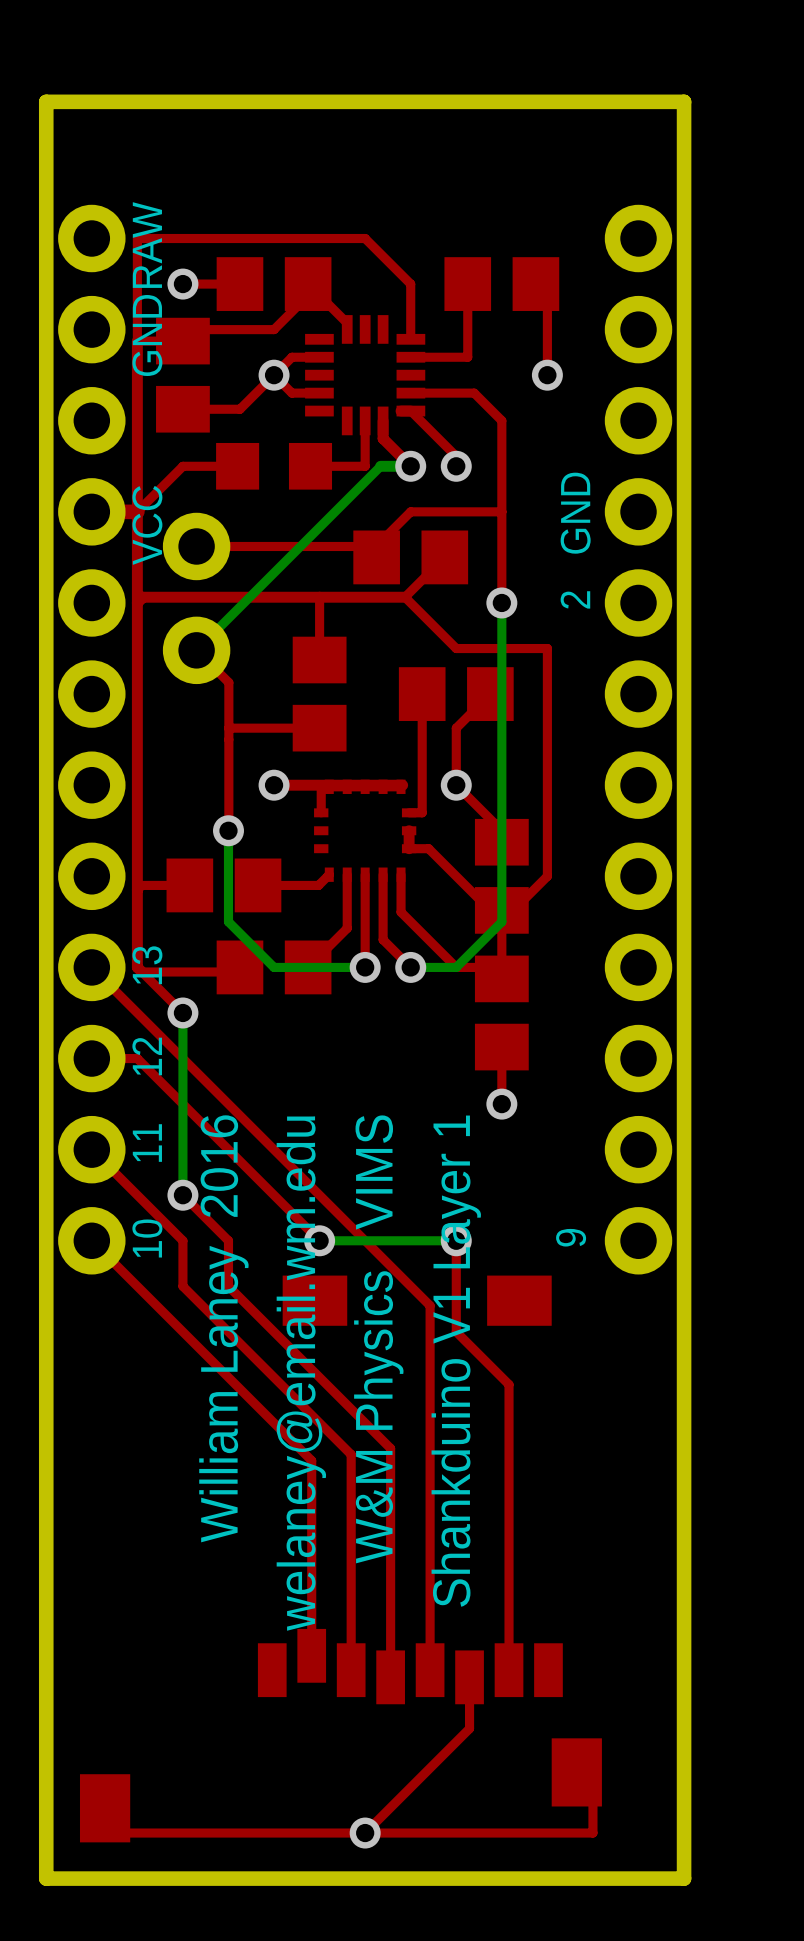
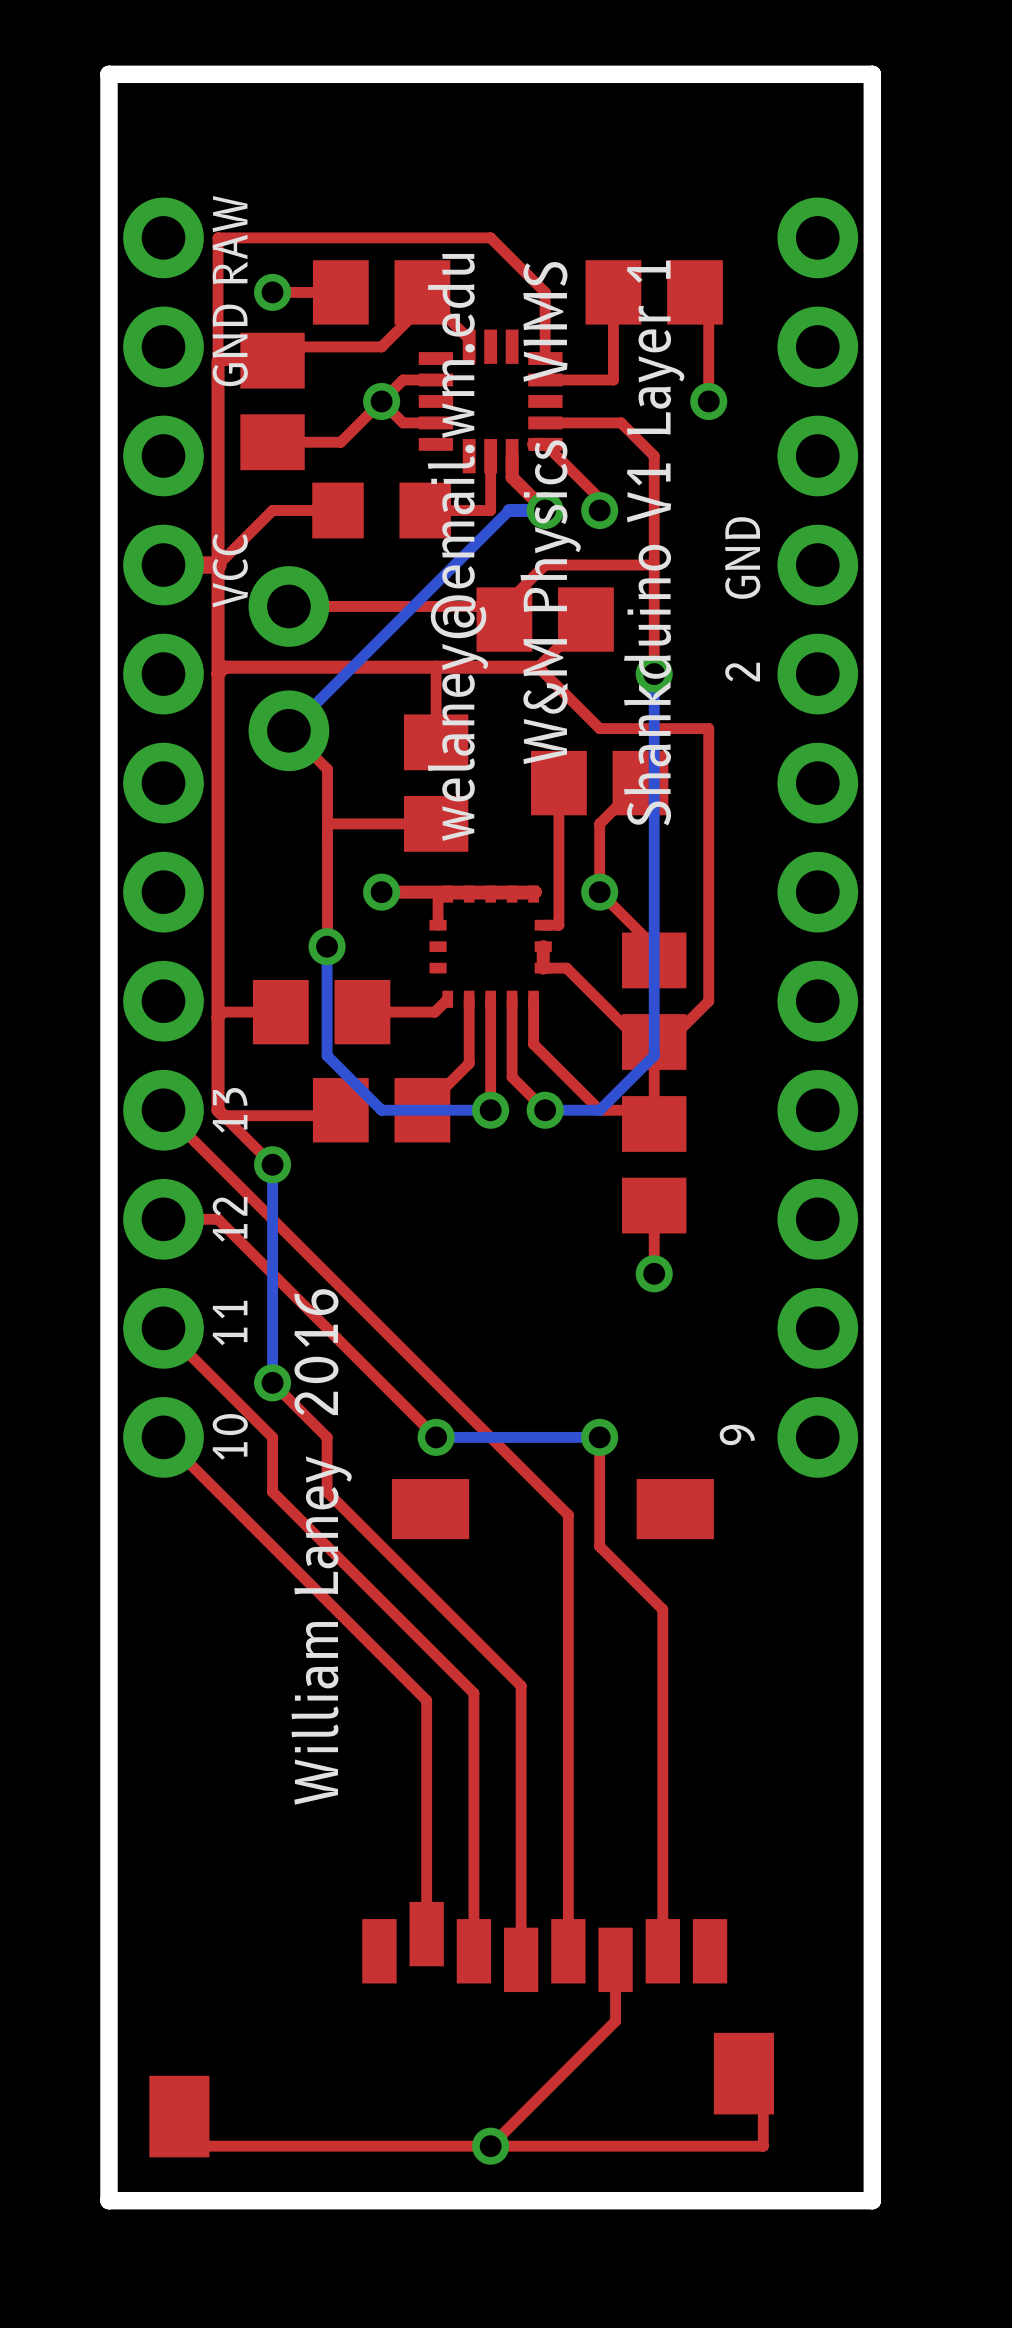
text position: W&M Physics VIMS (378, 1339) -> W&M Physics VIMS (550, 513)
text position: Shankduino V1 Layer 1 (456, 1361) -> Shankduino V1 Layer 1 (654, 543)
text position: welaney@email.wm.edu (301, 1373) -> welaney@email.wm.edu (457, 547)

